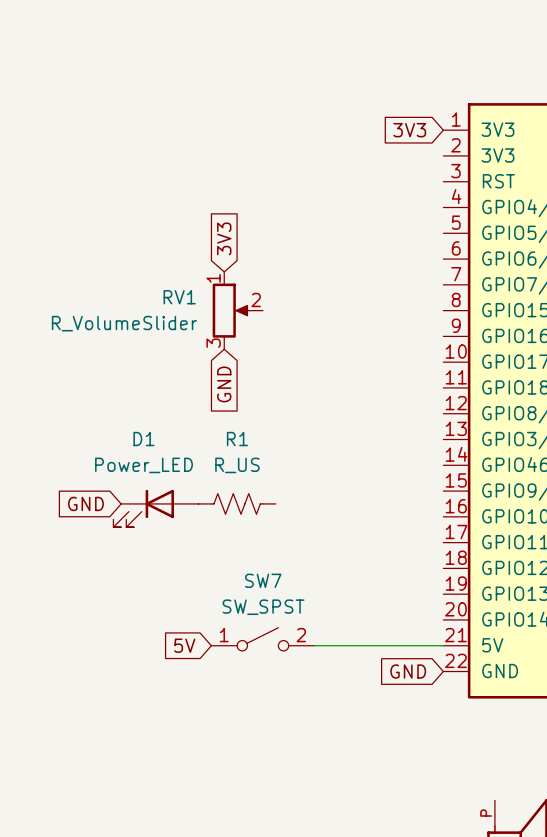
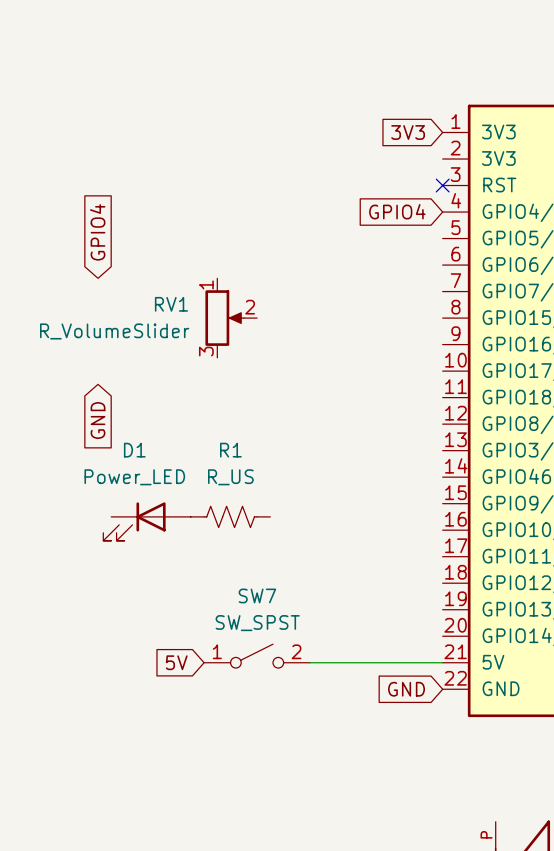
no-connect mark: none -> (442, 185)
global label: none -> GPIO4 (397, 211)
global label: none -> GPIO4 (97, 232)
global label: 3V3 (224, 238) -> none
global label: GND (224, 384) -> none
global label: none -> GND (98, 420)
global label: GND (85, 503) -> none

